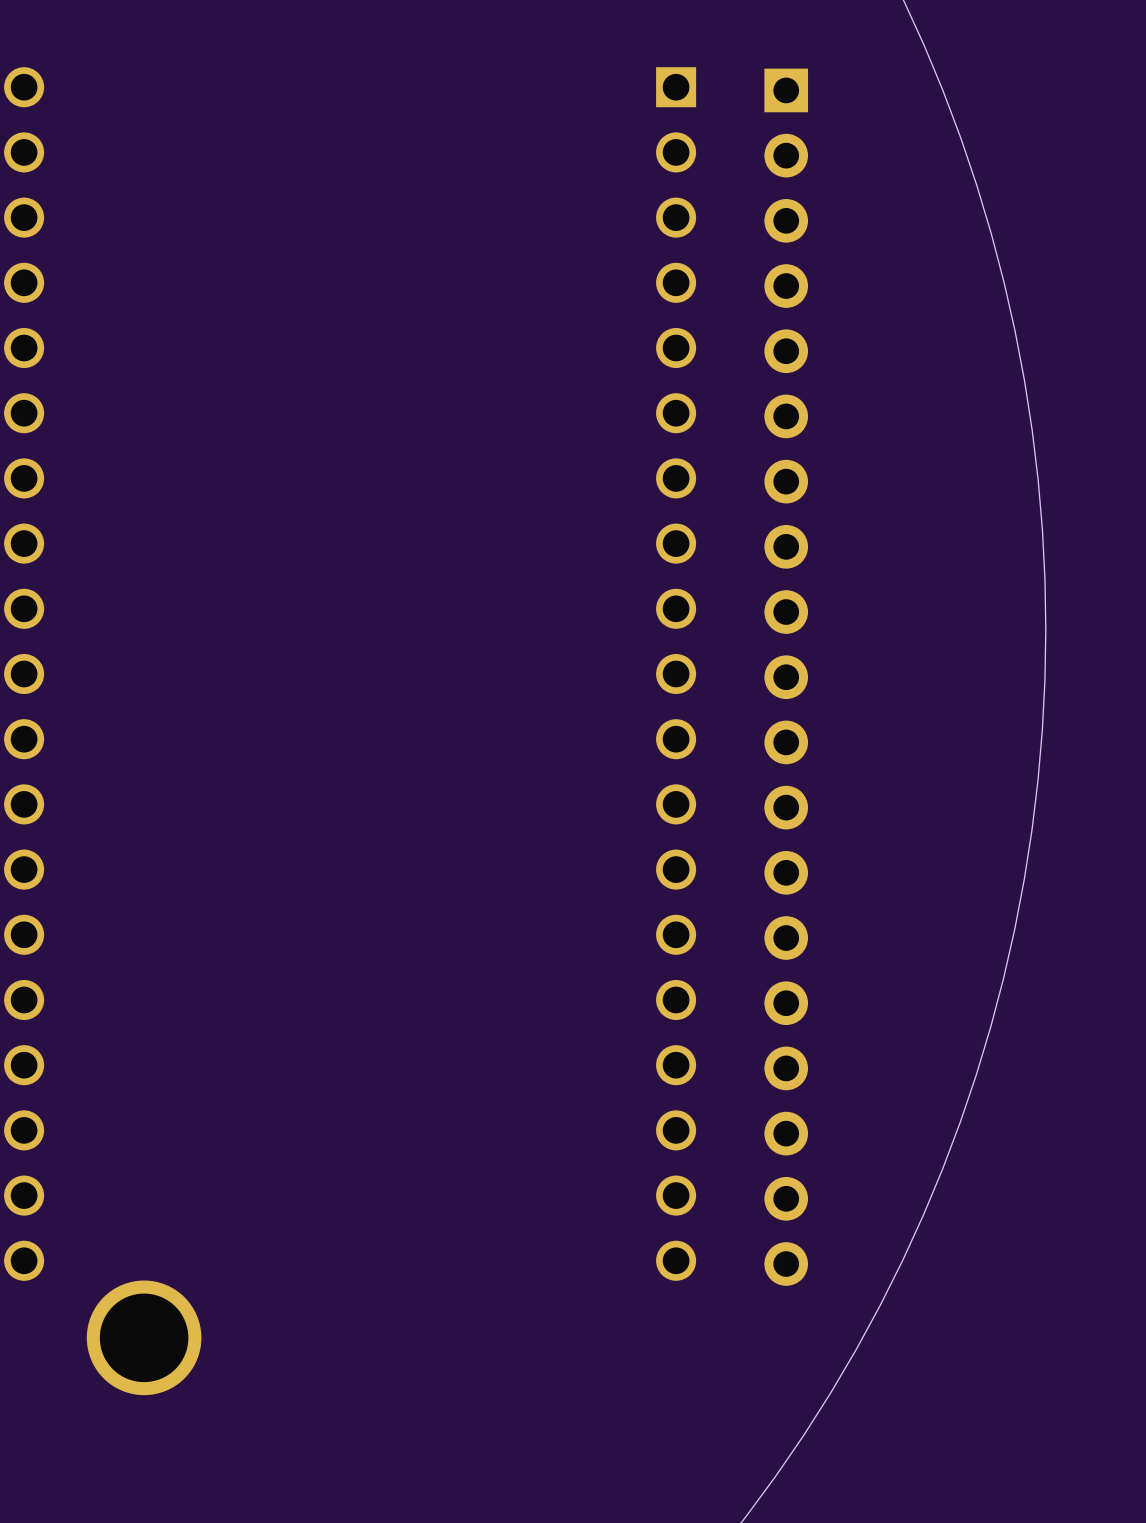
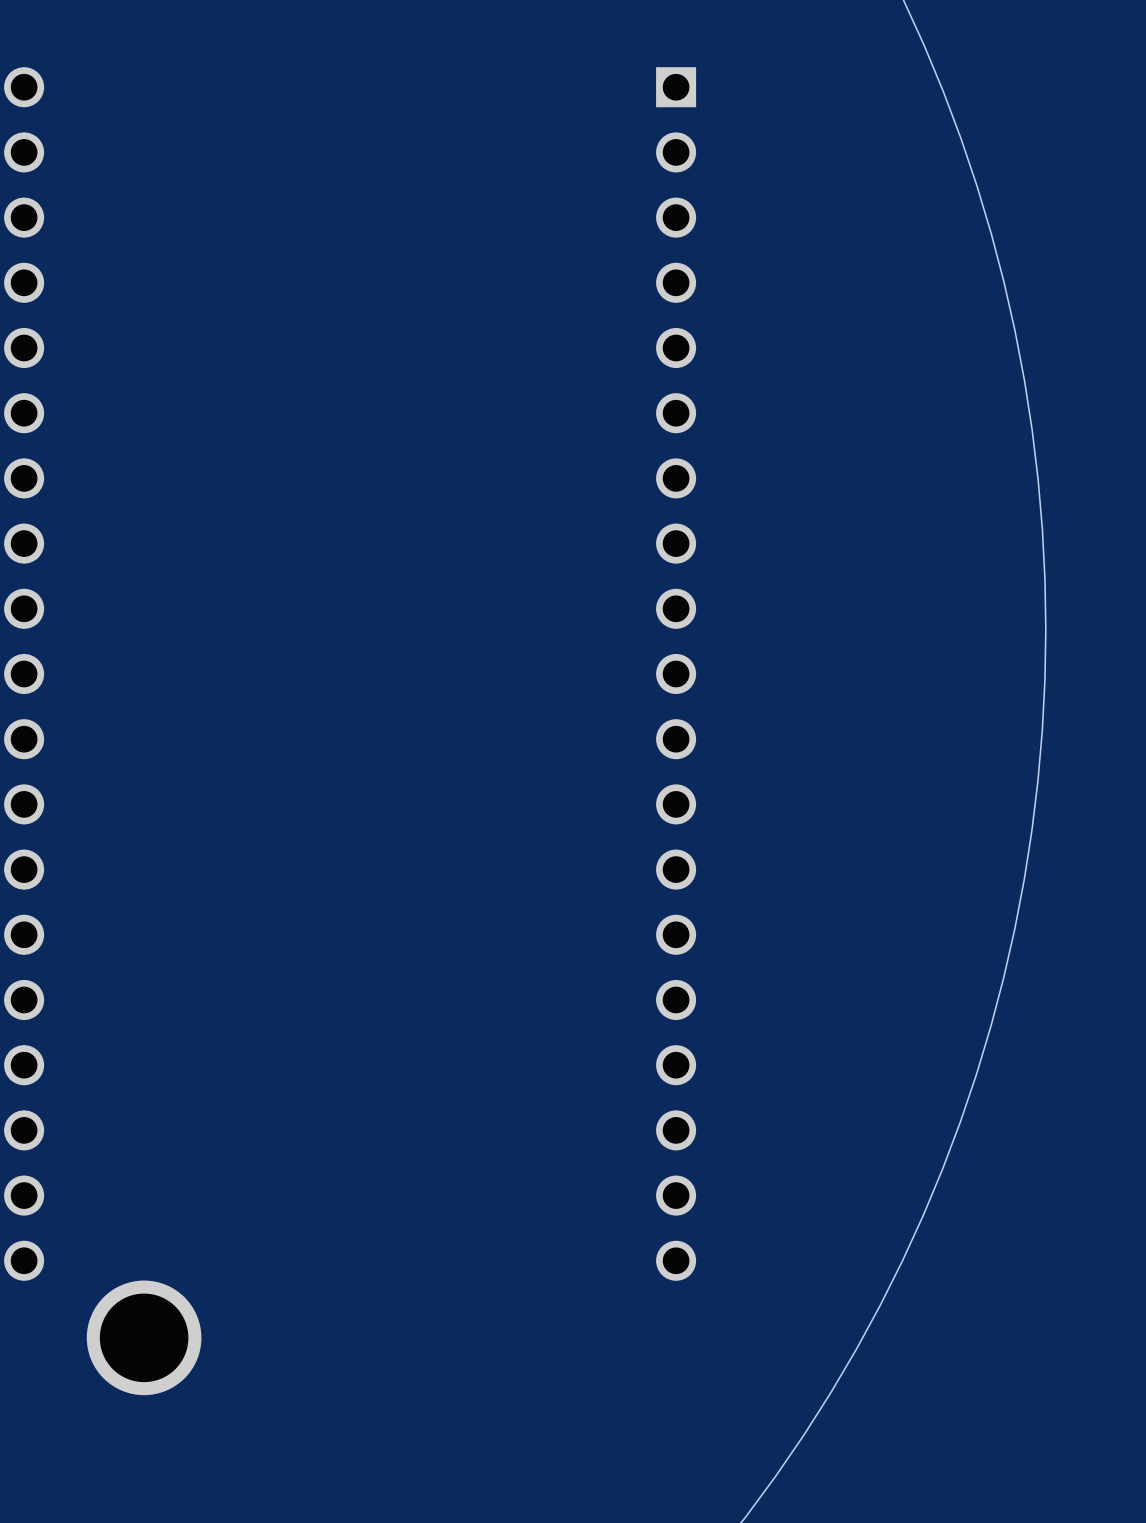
part: (786, 677) -> none

